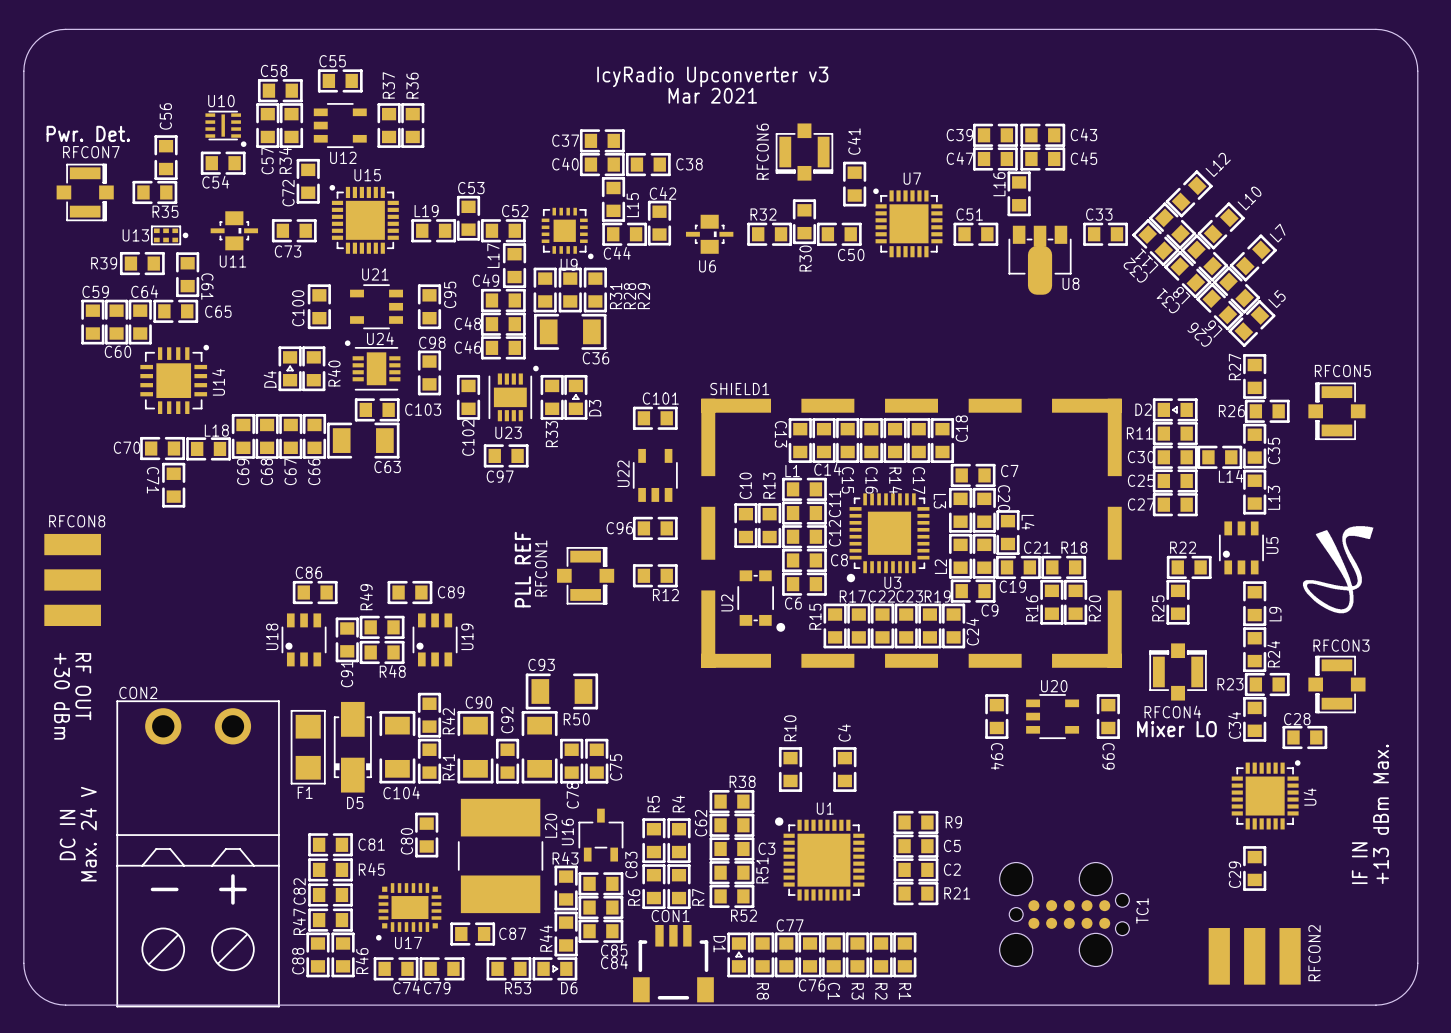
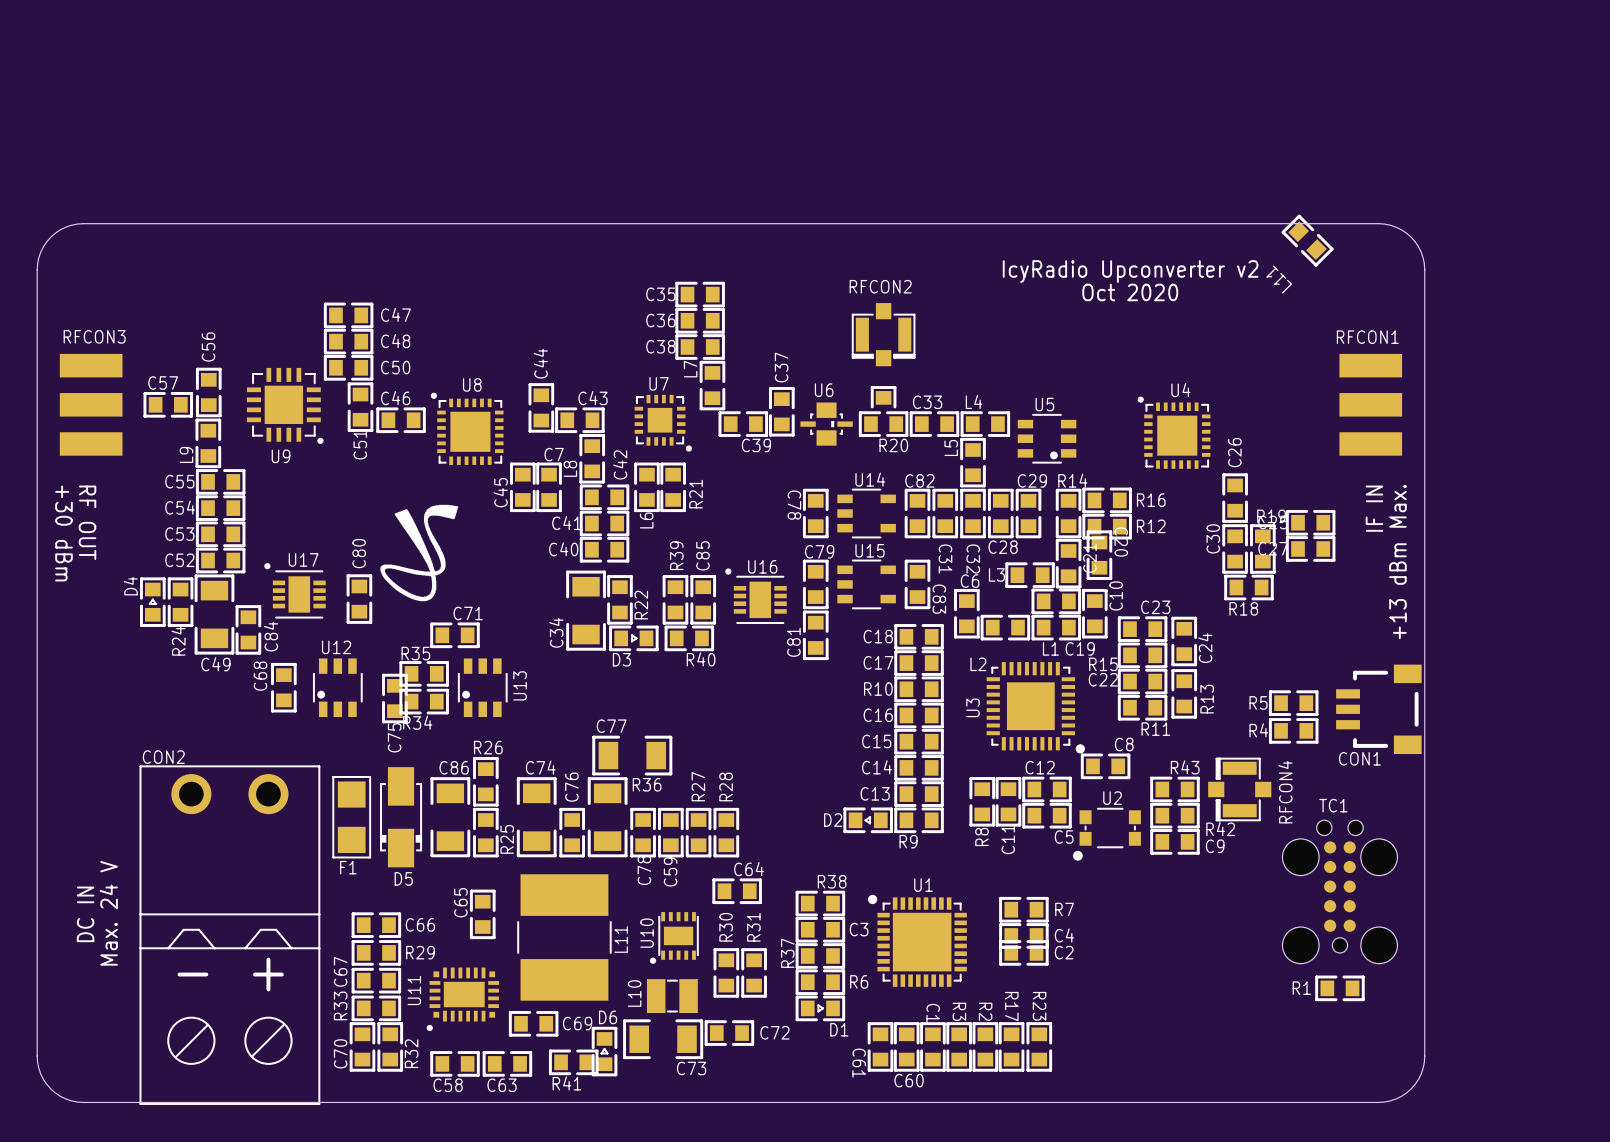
C55 name position: C55 (332, 61) -> C55 (179, 481)
C58 name position: C58 (274, 70) -> C58 (448, 1085)
text: IcyRadio Upconverter v3 (712, 76) -> none
C55 position: (340, 80) -> (220, 481)
C58 position: (280, 90) -> (455, 1063)
text: Mar 2021 (712, 95) -> none
U12 footprint: [313, 103, 367, 149] -> [312, 658, 363, 718]
U10 footprint: [205, 110, 247, 147] -> [649, 912, 699, 964]
C57 rotation: 0° (267, 125) -> 90° clockwise (168, 404)
C57 position: (267, 125) -> (168, 404)
R34 rotation: 0° (291, 125) -> 90° clockwise (424, 701)
R34 position: (291, 125) -> (424, 701)
R37: (389, 125) -> none
R36: (412, 125) -> none
text: Pwr. Det. (88, 133) -> none
C43 name position: C43 (1083, 134) -> C43 (593, 398)
C39 name position: C39 (959, 135) -> C39 (756, 445)
C39 position: (995, 135) -> (743, 424)
C43 position: (1042, 135) -> (579, 420)
C37 rotation: 0° (602, 140) -> 90° clockwise (781, 411)
C37 position: (602, 140) -> (781, 411)
C41 name position: C41 (854, 141) -> C41 (566, 522)
RFCON6: (804, 152) -> none
C56 position: (166, 157) -> (208, 392)
U12 name position: U12 (343, 157) -> U12 (336, 647)
C47 name position: C47 (960, 158) -> C47 (395, 314)
C45 name position: C45 (1083, 158) -> C45 (500, 492)
C47 position: (995, 159) -> (348, 315)
C45 rotation: 0° (1042, 159) -> 90° clockwise (522, 487)
C45 position: (1042, 159) -> (522, 487)
C57 name position: C57 (267, 160) -> C57 (163, 382)
C54 position: (223, 163) -> (220, 508)
C40 position: (602, 164) -> (604, 549)
C38 position: (648, 164) -> (700, 347)
C38 name position: C38 (689, 164) -> C38 (660, 346)
C72 rotation: 0° (308, 181) -> 90° clockwise (729, 1033)
C72 position: (308, 181) -> (729, 1033)
C54 name position: C54 (215, 182) -> C54 (180, 507)
U15 footprint: [329, 184, 399, 254] -> [837, 559, 896, 610]
C41 rotation: 0° (854, 184) -> 90° clockwise (604, 523)
C41 position: (854, 184) -> (604, 523)
C53 name position: C53 (471, 188) -> C53 (179, 534)
U7 footprint: [873, 188, 943, 258] -> [634, 394, 692, 452]
RFCON7: (85, 192) -> none
R35 position: (154, 192) -> (424, 673)
C72 name position: C72 (288, 193) -> C72 (774, 1032)
L16: (1019, 193) -> none
L12: (1189, 193) -> none
L10 name position: L10 (1249, 198) -> L10 (634, 993)
L15: (613, 199) -> none
L10 footprint: [1197, 202, 1245, 250] -> [646, 979, 698, 1014]
U9 footprint: [541, 207, 594, 260] -> [246, 367, 324, 444]
R35 name position: R35 (165, 211) -> R35 (415, 653)
C52 name position: C52 (515, 211) -> C52 (179, 560)
C51 name position: C51 (969, 214) -> C51 (360, 444)
C53 rotation: 0° (468, 218) -> 90° clockwise (220, 534)
C53 position: (468, 218) -> (220, 534)
C73 footprint: [271, 219, 317, 243] -> [623, 1019, 704, 1060]
R30 position: (804, 221) -> (726, 972)
C42 rotation: 0° (659, 223) -> 90° clockwise (604, 497)
C42 position: (659, 223) -> (604, 497)
U13 footprint: [150, 225, 189, 246] -> [457, 658, 508, 718]
U8 footprint: [1008, 225, 1072, 295] -> [430, 392, 504, 465]
U11: (234, 230) -> none
L19: (433, 230) -> none
C52 position: (503, 230) -> (220, 560)
L7 name position: L7 (1277, 233) -> L7 (690, 369)
C44 rotation: 0° (624, 234) -> 90° clockwise (541, 407)
C44 position: (624, 234) -> (541, 407)
U6 position: (709, 234) -> (826, 424)
R32: (769, 234) -> none
C50 position: (839, 234) -> (348, 367)
C51 rotation: 0° (975, 234) -> 90° clockwise (360, 407)
C51 position: (975, 234) -> (360, 407)
C33 position: (1105, 234) -> (934, 424)
U13 name position: U13 (135, 235) -> U13 (520, 685)
C32 rotation: 0° (1155, 242) -> 45° clockwise (973, 513)
C32 position: (1155, 242) -> (973, 513)
C73 name position: C73 (288, 251) -> C73 (691, 1068)
board edge: (23, 252) (24, 65) (29, 50) (36, 41) (44, 34) (60, 29) (1375, 29) (1396, 34) (1412, 50) (1417, 71) (1417, 968) (1409, 988) (1401, 996) (1386, 1003) (1236, 1005) -> (37, 269) (40, 252) (50, 237) (65, 227) (83, 223) (1378, 223) (1390, 225) (1401, 229) (1411, 237) (1418, 246) (1423, 257) (1424, 269) (1424, 1056) (1421, 1073) (1411, 1088) (1396, 1098) (1378, 1102)
C44 name position: C44 (617, 253) -> C44 (540, 363)
text: none -> IcyRadio Upconverter v2 (1130, 271)
C50 name position: C50 (851, 254) -> C50 (395, 367)
L8 rotation: 0° (1204, 257) -> 45° clockwise (592, 458)
L8 position: (1204, 257) -> (592, 458)
L7 rotation: 0° (1253, 257) -> 45° counterclockwise (712, 385)
L7 position: (1253, 257) -> (712, 385)
R30 name position: R30 (805, 258) -> R30 (726, 927)
R39 rotation: 0° (142, 263) -> 90° clockwise (675, 599)
R39 position: (142, 263) -> (675, 599)
L17: (514, 265) -> none
U6 name position: U6 (707, 266) -> U6 (824, 390)
text: none -> Oct 2020 (1130, 292)
C61: (187, 274) -> none
C31 rotation: 0° (1187, 274) -> 45° clockwise (945, 513)
C31 position: (1187, 274) -> (945, 513)
C49 name position: C49 (485, 280) -> C49 (215, 664)
U8 name position: U8 (1070, 283) -> U8 (472, 384)
C49 footprint: [480, 288, 526, 313] -> [194, 574, 235, 655]
R31 position: (545, 290) -> (754, 972)
R28 position: (570, 290) -> (726, 832)
R29: (595, 290) -> none
L6 rotation: 0° (1236, 290) -> 45° clockwise (646, 487)
L6 position: (1236, 290) -> (646, 487)
R31 name position: R31 (616, 296) -> R31 (753, 927)
R28 name position: R28 (630, 296) -> R28 (726, 787)
L5 name position: L5 (1276, 298) -> L5 (951, 448)
C100: (319, 306) -> none
U21: (376, 306) -> none
C95: (429, 306) -> none
C26 rotation: 0° (1219, 306) -> 45° clockwise (1235, 498)
C26 position: (1219, 306) -> (1235, 498)
C65: (175, 311) -> none
C36 footprint: [534, 313, 607, 350] -> [675, 307, 725, 334]
C59: (92, 322) -> none
C60: (116, 322) -> none
C64 rotation: 0° (140, 322) -> 90° clockwise (737, 891)
C64 position: (140, 322) -> (737, 891)
C48 name position: C48 (467, 323) -> C48 (395, 341)
L5 rotation: 0° (1251, 323) -> 45° counterclockwise (973, 462)
L5 position: (1251, 323) -> (973, 462)
C48 position: (503, 324) -> (348, 341)
C26 name position: C26 (1199, 334) -> C26 (1234, 452)
U14 footprint: [140, 344, 210, 415] -> [837, 488, 896, 539]
C46 name position: C46 (467, 347) -> C46 (395, 398)
C46 position: (503, 347) -> (401, 420)
C36 name position: C36 (595, 358) -> C36 (660, 320)
U24: (372, 365) -> none
R27 name position: R27 (1234, 367) -> R27 (698, 786)
D4 position: (290, 368) -> (152, 602)
R40 rotation: 0° (313, 368) -> 90° clockwise (689, 638)
R40 position: (313, 368) -> (689, 638)
C98: (429, 372) -> none
R27 position: (1254, 376) -> (698, 832)
D4 name position: D4 (270, 379) -> D4 (130, 586)
U14 name position: U14 (218, 382) -> U14 (870, 479)
U23: (513, 393) -> none
C102: (468, 397) -> none
R33: (552, 397) -> none
D3 rotation: 0° (575, 397) -> 90° clockwise (633, 638)
D3 position: (575, 397) -> (633, 638)
C103: (377, 409) -> none
D2 position: (1175, 409) -> (868, 820)
R26: (1267, 411) -> none
RFCON5: (1336, 411) -> none
C101: (655, 418) -> none
C63 footprint: [327, 422, 400, 459] -> [482, 1051, 533, 1077]
C18 name position: C18 (961, 428) -> C18 (878, 636)
R11 name position: R11 (1139, 433) -> R11 (1155, 729)
R11 position: (1175, 433) -> (1142, 707)
C69: (243, 436) -> none
C68 position: (267, 436) -> (283, 687)
C67: (290, 436) -> none
C66: (314, 436) -> none
C13 rotation: 0° (800, 440) -> 90° clockwise (919, 794)
C13 position: (800, 440) -> (919, 794)
C14 rotation: 0° (823, 440) -> 90° clockwise (919, 767)
C14 position: (823, 440) -> (919, 767)
C15 rotation: 0° (847, 440) -> 90° clockwise (919, 741)
C15 position: (847, 440) -> (919, 741)
C16 rotation: 0° (871, 440) -> 90° clockwise (919, 715)
C16 position: (871, 440) -> (919, 715)
R14 position: (895, 440) -> (1068, 513)
C17 rotation: 0° (918, 440) -> 90° clockwise (919, 663)
C17 position: (918, 440) -> (919, 663)
C18 rotation: 0° (942, 440) -> 90° clockwise (919, 636)
C18 position: (942, 440) -> (919, 636)
C35 rotation: 0° (1254, 446) -> 90° clockwise (700, 294)
C35 position: (1254, 446) -> (700, 294)
C70: (162, 448) -> none
L18: (208, 448) -> none
C35 name position: C35 (1273, 451) -> C35 (660, 294)
C97: (506, 455) -> none
C30 rotation: 0° (1175, 457) -> 90° clockwise (1235, 548)
C30 position: (1175, 457) -> (1235, 548)
L14: (1219, 457) -> none
drawing: none -> [380, 504, 459, 602]
C63 name position: C63 (387, 466) -> C63 (502, 1085)
text: none -> IF IN (1374, 508)
C68 name position: C68 (266, 471) -> C68 (260, 676)
L1 name position: L1 (792, 471) -> L1 (1050, 648)
C7 name position: C7 (1009, 471) -> C7 (554, 454)
C78: none -> (815, 513)
C82: none -> (917, 513)
U22: (655, 475) -> none
C7 rotation: 0° (973, 475) -> 90° clockwise (549, 487)
C7 position: (973, 475) -> (549, 487)
R14 name rotation: 0° (895, 480) -> 90° counterclockwise (1072, 480)
R14 name position: R14 (895, 480) -> R14 (1072, 480)
C71 rotation: 0° (173, 485) -> 90° clockwise (455, 635)
C71 position: (173, 485) -> (455, 635)
C10 name position: C10 (745, 485) -> C10 (1116, 595)
R13 name position: R13 (769, 485) -> R13 (1207, 699)
L1 position: (804, 489) -> (1056, 627)
L13: (1254, 492) -> none
L3 rotation: 0° (960, 510) -> 90° clockwise (1030, 575)
L3 position: (960, 510) -> (1030, 575)
C11 rotation: 0° (804, 513) -> 90° clockwise (1008, 801)
C11 position: (804, 513) -> (1008, 801)
text: none -> +13 dBm Max. (1397, 562)
L4 name position: L4 (1027, 522) -> L4 (974, 401)
C10 position: (745, 525) -> (1094, 613)
R13 position: (769, 525) -> (1184, 693)
drawing: [1302, 526, 1374, 614] -> none
C96: (655, 528) -> none
L4 rotation: 0° (1007, 532) -> 90° clockwise (985, 424)
L4 position: (1007, 532) -> (985, 424)
C12 name rotation: 0° (834, 533) -> 90° clockwise (1040, 767)
C12 name position: C12 (834, 533) -> C12 (1040, 767)
SHIELD1: (911, 533) -> none
C12 position: (804, 536) -> (1047, 789)
U3 rotation: 0° (888, 537) -> 90° counterclockwise (1035, 707)
U3 position: (888, 537) -> (1035, 707)
U17: none -> (295, 590)
RFCON1 footprint: [557, 547, 615, 605] -> [1339, 353, 1403, 456]
R18 name position: R18 (1074, 547) -> R18 (1243, 608)
U5 rotation: 0° (1241, 547) -> 90° counterclockwise (1047, 438)
U5 position: (1241, 547) -> (1047, 438)
C80: none -> (359, 599)
L2 rotation: 0° (960, 556) -> 90° clockwise (1005, 627)
L2 position: (960, 556) -> (1005, 627)
C19 rotation: 0° (984, 556) -> 90° clockwise (1056, 601)
C19 position: (984, 556) -> (1056, 601)
C8 position: (804, 560) -> (1105, 766)
C8 name position: C8 (839, 560) -> C8 (1124, 744)
C21 rotation: 0° (1018, 567) -> 90° clockwise (1068, 563)
C21 position: (1018, 567) -> (1068, 563)
R18 position: (1063, 567) -> (1248, 587)
R22 rotation: 0° (1189, 567) -> 90° clockwise (619, 599)
R22 position: (1189, 567) -> (619, 599)
RFCON1 name position: RFCON1 (541, 568) -> RFCON1 (1367, 337)
text: PLL REF (522, 569) -> none
R12 position: (655, 575) -> (1107, 526)
RFCON8: (72, 579) -> none
R20 footprint: [1063, 579, 1088, 625] -> [858, 386, 909, 437]
C81: none -> (815, 635)
U3 name position: U3 (892, 582) -> U3 (973, 707)
C6 rotation: 0° (804, 584) -> 90° clockwise (966, 613)
C6 position: (804, 584) -> (966, 613)
C9 position: (973, 591) -> (1174, 841)
C86: (315, 592) -> none
C89: (409, 592) -> none
R12 name position: R12 (665, 595) -> R12 (1151, 526)
C22 name position: C22 (881, 596) -> C22 (1103, 679)
U2 rotation: 0° (761, 601) -> 90° clockwise (1106, 834)
U2 position: (761, 601) -> (1106, 834)
R16 rotation: 0° (1051, 602) -> 90° clockwise (1107, 500)
R16 position: (1051, 602) -> (1107, 500)
R25: (1178, 602) -> none
C6 name position: C6 (793, 603) -> C6 (970, 581)
L9 position: (1254, 603) -> (208, 443)
R16 name position: R16 (1032, 608) -> R16 (1151, 500)
R20 name position: R20 (1094, 608) -> R20 (893, 445)
C9 name position: C9 (989, 610) -> C9 (1215, 846)
L9 name position: L9 (1275, 614) -> L9 (186, 454)
R15 rotation: 0° (835, 625) -> 90° clockwise (1142, 655)
R15 position: (835, 625) -> (1142, 655)
R17: (858, 625) -> none
C22 rotation: 0° (882, 625) -> 90° clockwise (1142, 681)
C22 position: (882, 625) -> (1142, 681)
C23 rotation: 0° (906, 625) -> 90° clockwise (1142, 629)
C23 position: (906, 625) -> (1142, 629)
R19 position: (929, 625) -> (1262, 548)
C24 position: (953, 625) -> (1184, 641)
R49: (382, 627) -> none
U18: (304, 639) -> none
U19: (435, 639) -> none
R24 position: (1254, 649) -> (180, 602)
R48: (382, 652) -> none
R24 name position: R24 (1273, 654) -> R24 (178, 641)
RFCON3 footprint: [1308, 655, 1366, 714] -> [59, 353, 123, 456]
C93 name: C93 (541, 664) -> C77 (611, 726)
RFCON4 rotation: 0° (1178, 671) -> 90° counterclockwise (1239, 789)
RFCON4 position: (1178, 671) -> (1239, 789)
C91 name: C91 (347, 674) -> C75 (394, 737)
R23 rotation: 0° (1267, 684) -> 90° clockwise (1039, 1046)
R23 position: (1267, 684) -> (1039, 1046)
text position: RF OUT (83, 686) -> RF OUT (87, 522)
text position: +30 dBm (62, 696) -> +30 dBm (63, 533)
C34 footprint: [1243, 696, 1267, 742] -> [566, 570, 606, 651]
C90 name: C90 (478, 702) -> C74 (540, 767)
C94: (996, 716) -> none
U20: (1052, 716) -> none
C99: (1108, 716) -> none
R50 name: R50 (576, 719) -> R36 (647, 784)
C28 name position: C28 (1297, 719) -> C28 (1003, 547)
C92 name: C92 (507, 720) -> C76 (571, 787)
R42 name: R42 (448, 721) -> R26 (488, 747)
R10 name position: R10 (790, 728) -> R10 (878, 689)
text: Mixer LO (1176, 729) -> none
C28 rotation: 0° (1304, 737) -> 90° clockwise (1000, 513)
C28 position: (1304, 737) -> (1000, 513)
R42: none -> (1174, 815)
U4 footprint: [1231, 760, 1301, 830] -> [1137, 396, 1211, 469]
R41 name: R41 (448, 767) -> R25 (507, 839)
C75 name: C75 (616, 767) -> C59 (670, 871)
R10 rotation: 0° (790, 769) -> 90° clockwise (919, 689)
R10 position: (790, 769) -> (919, 689)
C4 rotation: 0° (844, 769) -> 90° clockwise (1023, 935)
C4 position: (844, 769) -> (1023, 935)
C104 name: C104 (401, 792) -> C86 (454, 767)
U4 name position: U4 (1310, 796) -> U4 (1180, 390)
R38: (731, 801) -> none
R4 name position: R4 (678, 803) -> R4 (1258, 730)
R5 name position: R5 (653, 804) -> R5 (1258, 702)
U16 footprint: [578, 808, 624, 862] -> [725, 568, 787, 624]
text: +13 dBm Max. (1381, 814) -> none
R9 position: (915, 822) -> (919, 820)
R9 name position: R9 (953, 822) -> R9 (908, 841)
C62 name: C62 (701, 823) -> R38 (832, 881)
L20 name: L20 (551, 825) -> L11 (621, 939)
U16 name position: U16 (567, 832) -> U16 (762, 566)
R5 rotation: 0° (653, 840) -> 90° clockwise (1293, 703)
R5 position: (653, 840) -> (1293, 703)
R4 rotation: 0° (679, 840) -> 90° clockwise (1293, 730)
R4 position: (679, 840) -> (1293, 730)
C80 name: C80 (406, 841) -> C65 (460, 902)
C81 name: C81 (371, 844) -> C66 (420, 924)
C5 name position: C5 (952, 845) -> C5 (1064, 837)
C5 position: (915, 846) -> (1047, 815)
text: IF IN (1359, 863) -> none
C29 position: (1254, 868) -> (1028, 513)
R45 name: R45 (371, 869) -> R29 (420, 952)
R51 name: R51 (762, 870) -> R37 (787, 953)
C29 name rotation: 0° (1234, 874) -> 90° clockwise (1032, 480)
C29 name position: C29 (1234, 874) -> C29 (1032, 480)
C83 rotation: 0° (600, 883) -> 90° clockwise (917, 584)
C83 position: (600, 883) -> (917, 584)
R6: (653, 886) -> none
R7 rotation: 0° (679, 886) -> 90° clockwise (1023, 909)
R7 position: (679, 886) -> (1023, 909)
R43 rotation: 0° (566, 888) -> 90° clockwise (1174, 789)
R43 position: (566, 888) -> (1174, 789)
C82 name: C82 (299, 891) -> C67 (340, 971)
R21 rotation: 0° (915, 893) -> 90° clockwise (673, 487)
R21 position: (915, 893) -> (673, 487)
R1: none -> (1339, 988)
C85 rotation: 0° (600, 907) -> 90° clockwise (703, 599)
C85 position: (600, 907) -> (703, 599)
TC1 rotation: 0° (1064, 914) -> 90° counterclockwise (1339, 891)
TC1 position: (1064, 914) -> (1339, 891)
R52 name: R52 (743, 915) -> R6 (859, 981)
CON1 name position: CON1 (670, 916) -> CON1 (1359, 758)
R47 name: R47 (299, 921) -> R33 (340, 1005)
C77 name: C77 (790, 925) -> C61 (859, 1063)
RFCON2 footprint: [1208, 928, 1301, 985] -> [851, 303, 916, 367]
C84 rotation: 0° (600, 931) -> 90° clockwise (248, 629)
C84 position: (600, 931) -> (248, 629)
C87 name: C87 (512, 933) -> C69 (577, 1023)
R44: (566, 934) -> none
U17 name: U17 (408, 942) -> U11 (414, 990)
D1 name position: D1 (719, 944) -> D1 (839, 1029)
C85 name position: C85 (614, 950) -> C85 (702, 555)
RFCON2 name position: RFCON2 (1314, 953) -> RFCON2 (880, 286)
D1 rotation: 0° (738, 954) -> 90° clockwise (820, 1008)
D1 position: (738, 954) -> (820, 1008)
R8 position: (762, 954) -> (982, 801)
C88 name: C88 (298, 961) -> C70 (340, 1053)
R46 name: R46 (362, 961) -> R32 (411, 1053)
C84 name position: C84 (614, 962) -> C84 (271, 636)
CON1 rotation: 0° (673, 963) -> 90° counterclockwise (1378, 709)
CON1 position: (673, 963) -> (1378, 709)
C74: (396, 968) -> none
C79 rotation: 0° (442, 968) -> 90° clockwise (815, 584)
C79 position: (442, 968) -> (815, 584)
D6 rotation: 0° (554, 968) -> 90° counterclockwise (604, 1051)
C76 name: C76 (812, 985) -> C60 (909, 1080)
C79 name position: C79 (437, 988) -> C79 (819, 551)
R53 name: R53 (518, 988) -> R41 (566, 1083)
R8 name rotation: 0° (762, 991) -> 180° (982, 836)
C1 name position: C1 (833, 991) -> C1 (933, 1013)
R3 name position: R3 (857, 991) -> R3 (959, 1011)
R2 name position: R2 (881, 991) -> R2 (985, 1011)
R1 name: R1 (905, 991) -> R17 (1011, 1006)

